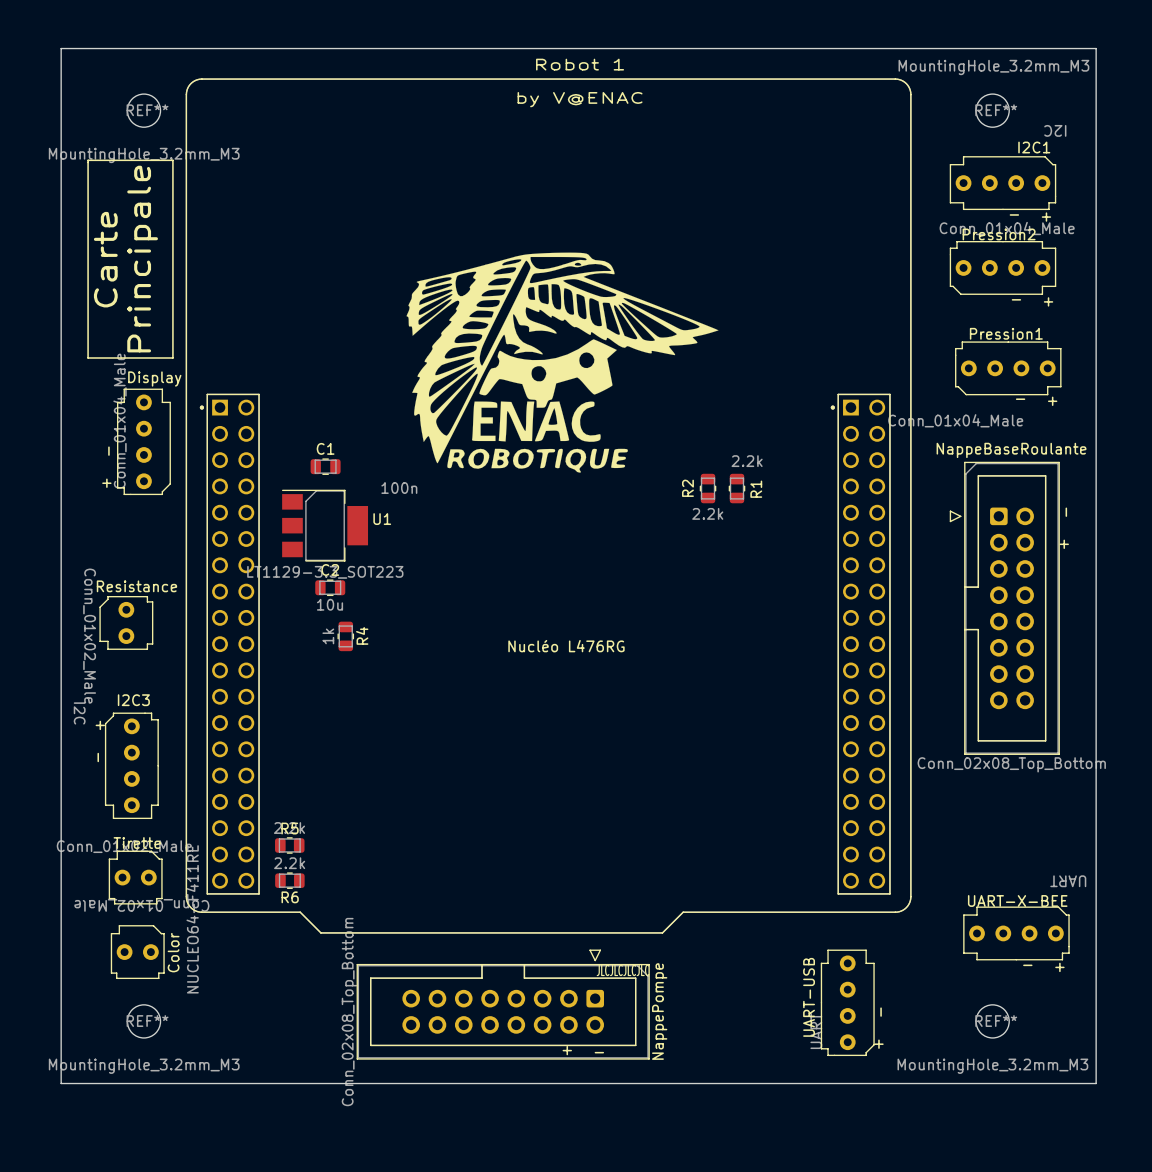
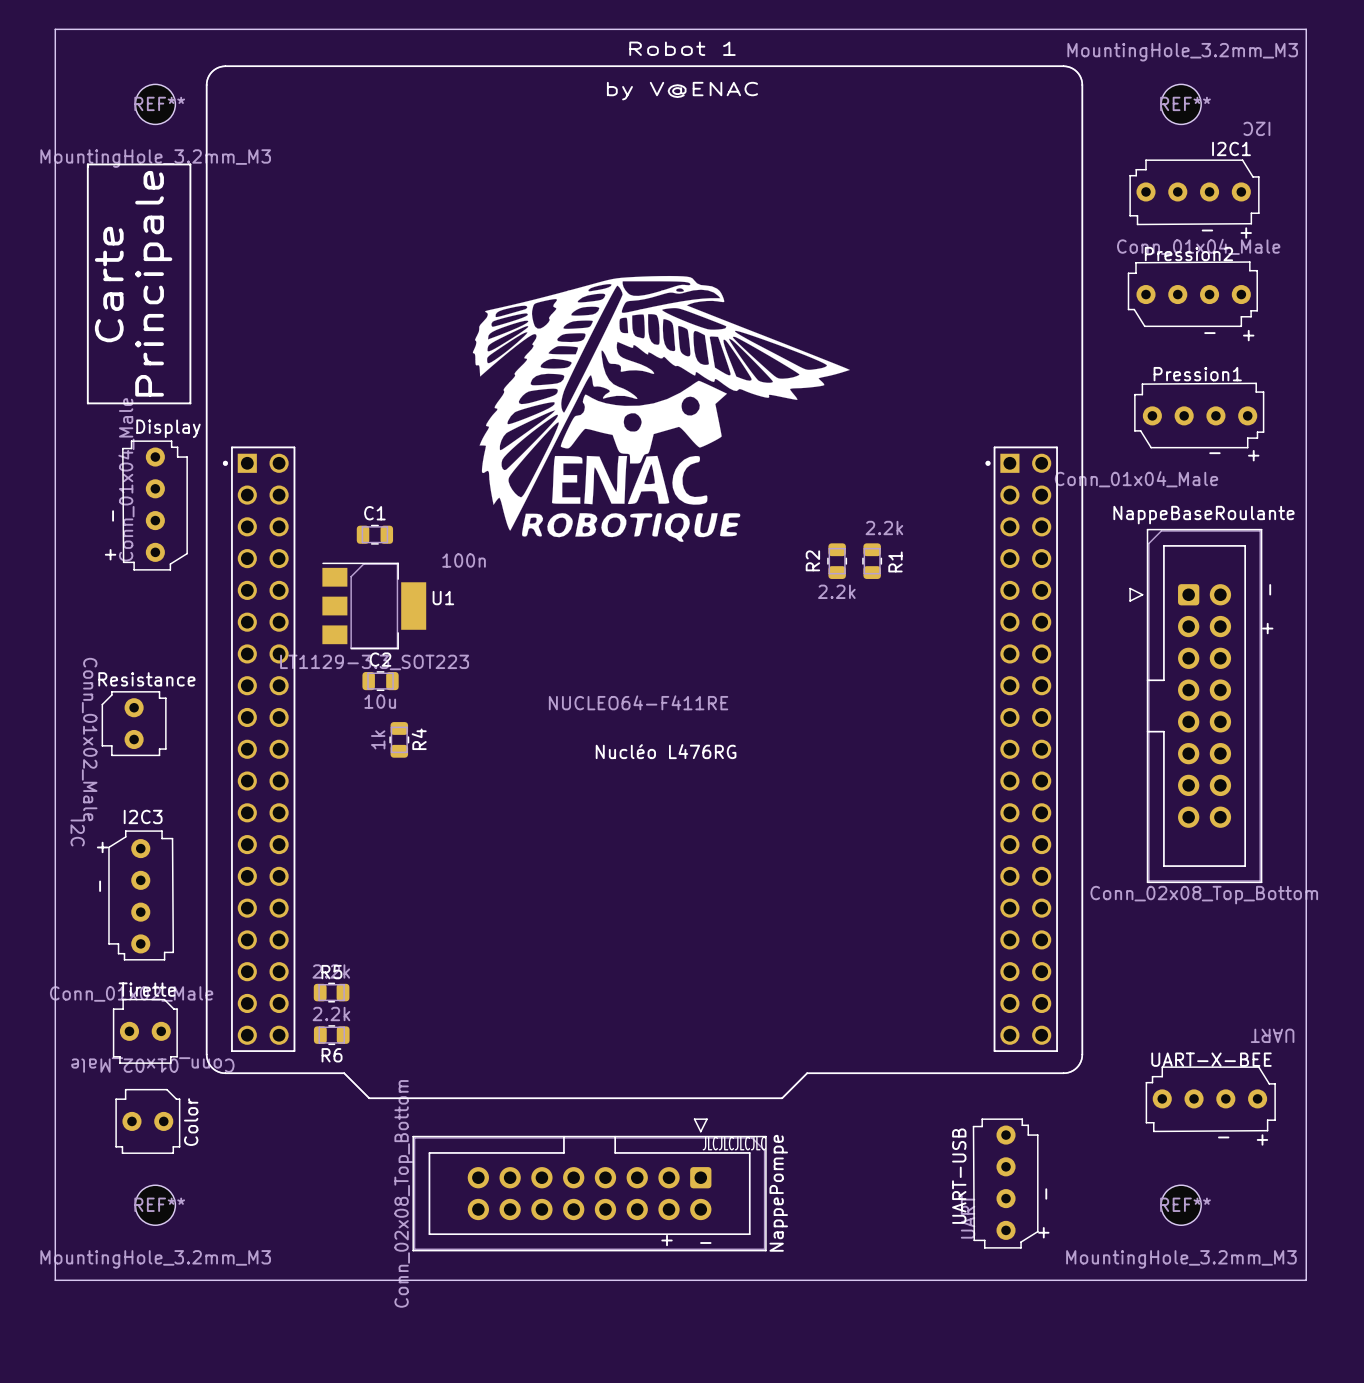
I2C1 footprint: [949, 156, 1057, 211] -> [1129, 159, 1260, 226]
Pression2 footprint: [949, 241, 1057, 295] -> [1127, 261, 1258, 328]
Pression1 footprint: [955, 341, 1062, 396] -> [1134, 382, 1265, 449]
Display footprint: [117, 388, 171, 496] -> [122, 440, 188, 571]
I2C3 footprint: [104, 712, 159, 819] -> [108, 830, 175, 961]
UART-X-BEE footprint: [963, 906, 1070, 961] -> [1145, 1066, 1276, 1133]
Nucléo L476RG value rotation: 0° (192, 919) -> 90° clockwise (638, 702)
Nucléo L476RG value position: NUCLEO64-F411RE (192, 919) -> NUCLEO64-F411RE (638, 702)
UART-USB footprint: [820, 949, 875, 1056] -> [972, 1118, 1039, 1249]

